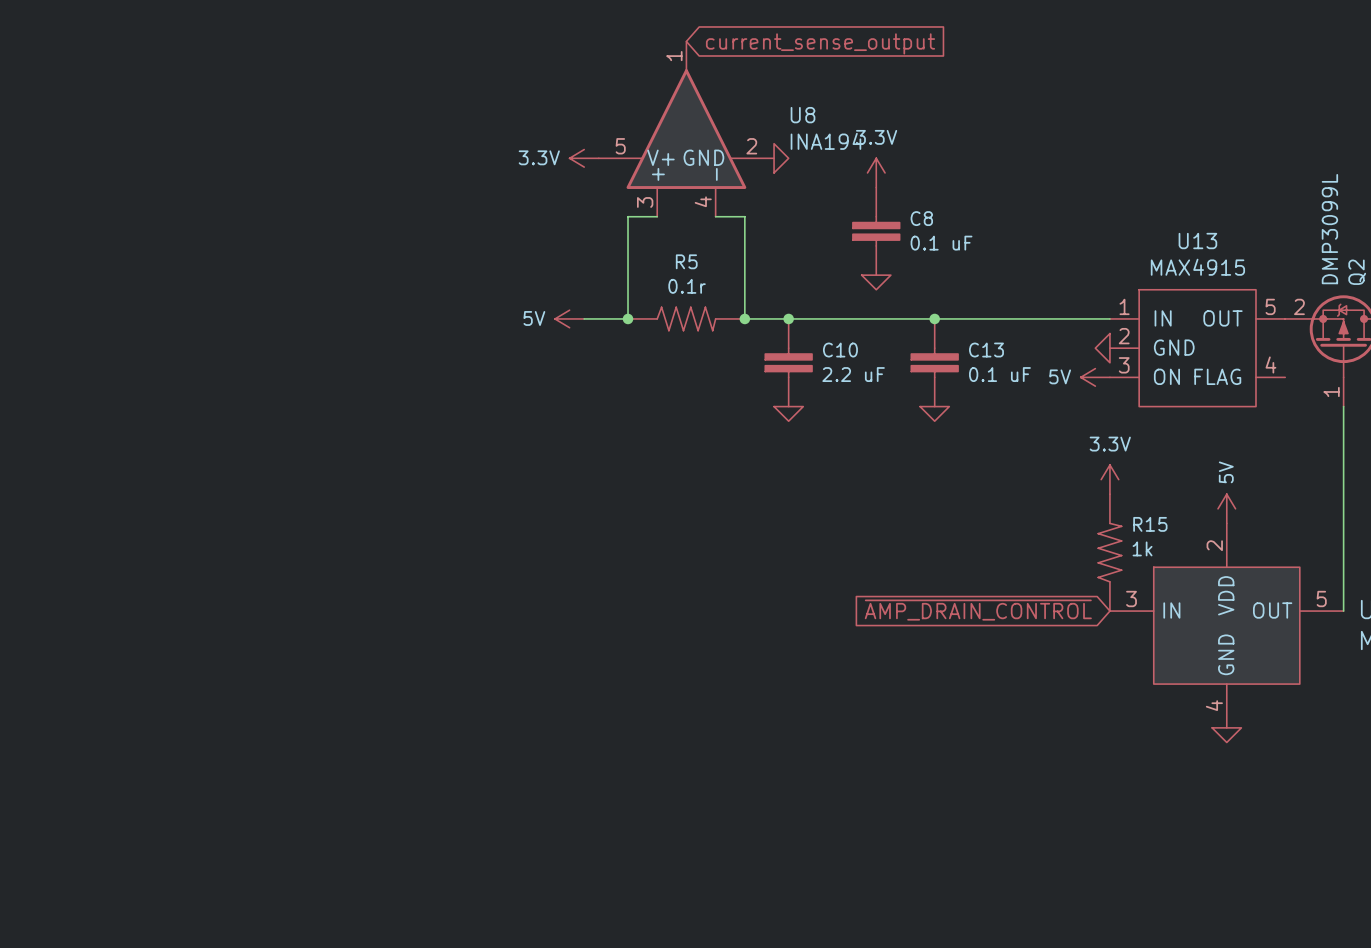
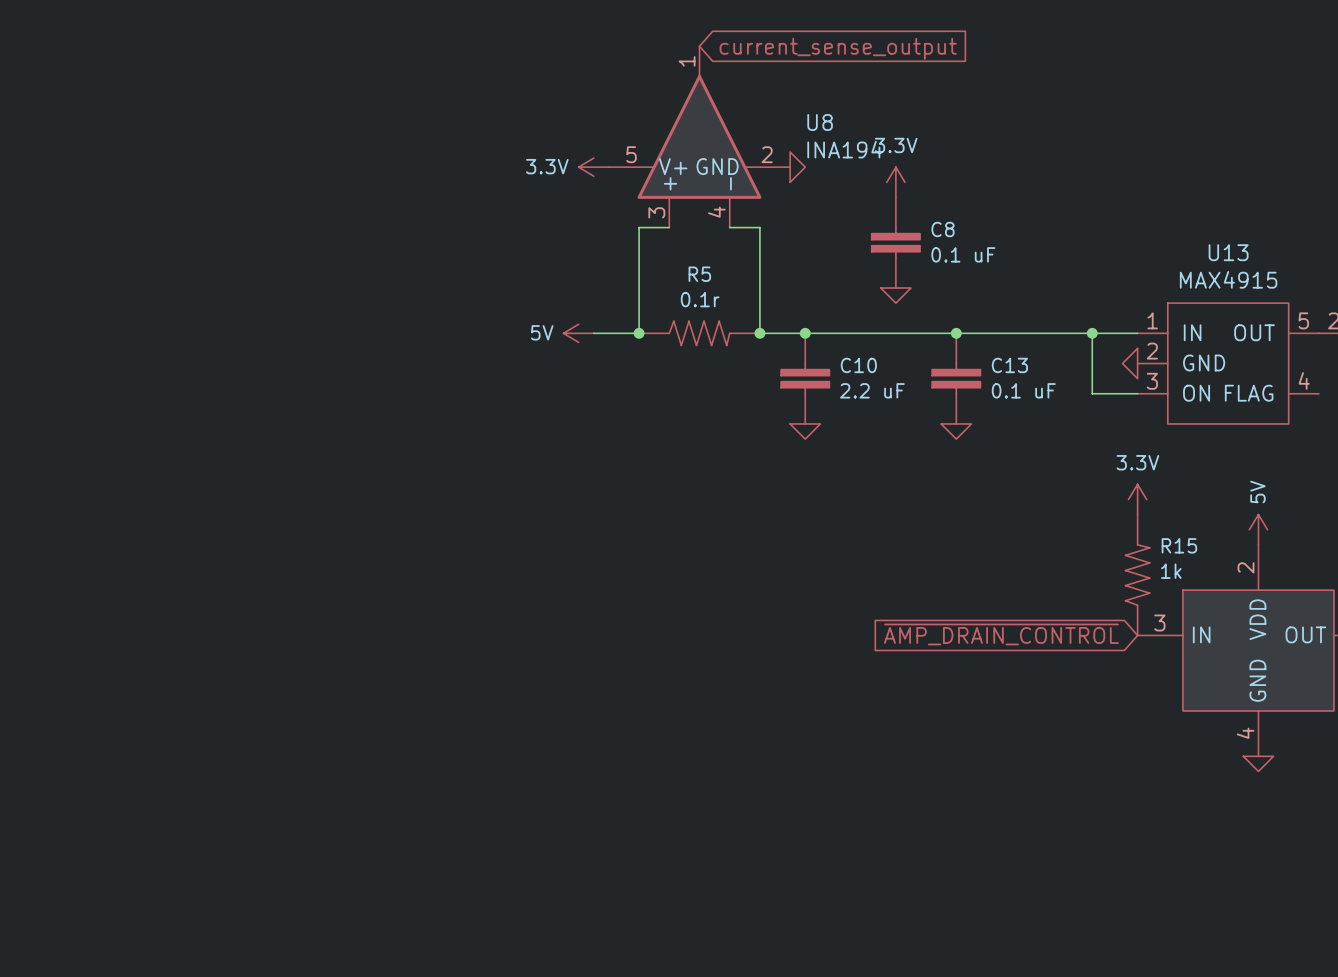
wire: none -> (1092, 333) (1092, 393) (1137, 393)
junction: none -> (1092, 333)
power symbol: 5V (1095, 377) -> none

